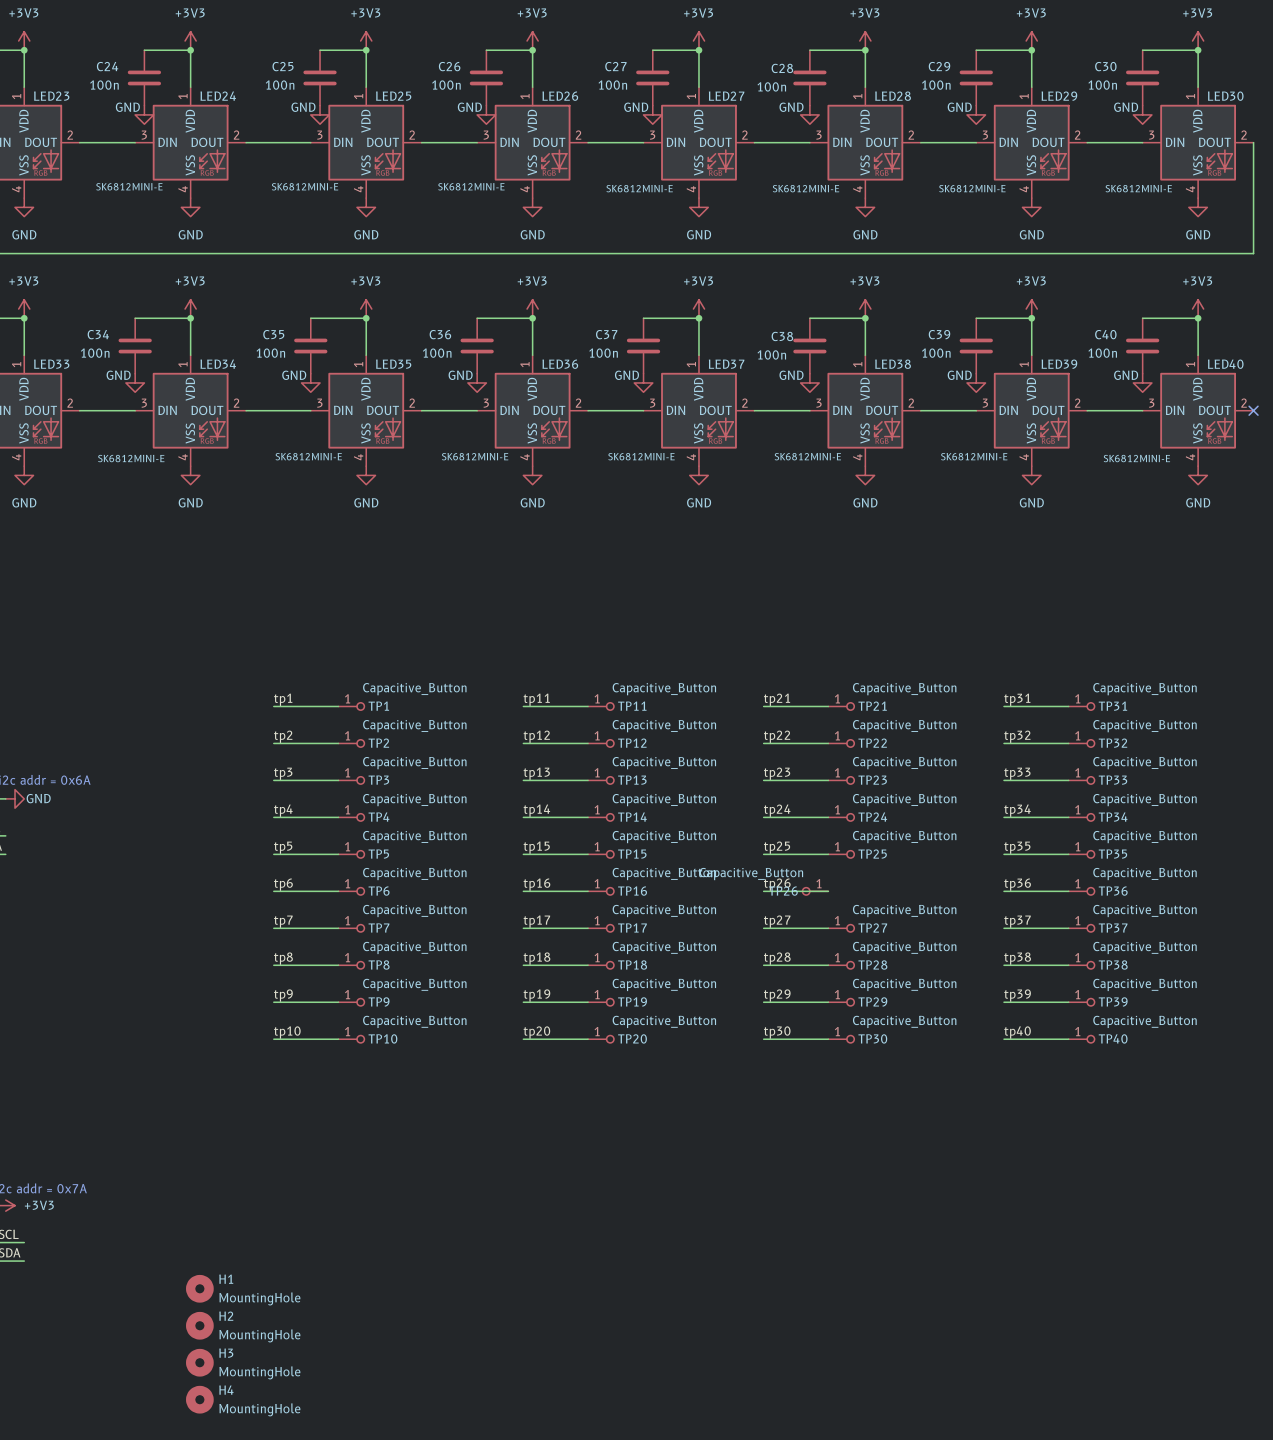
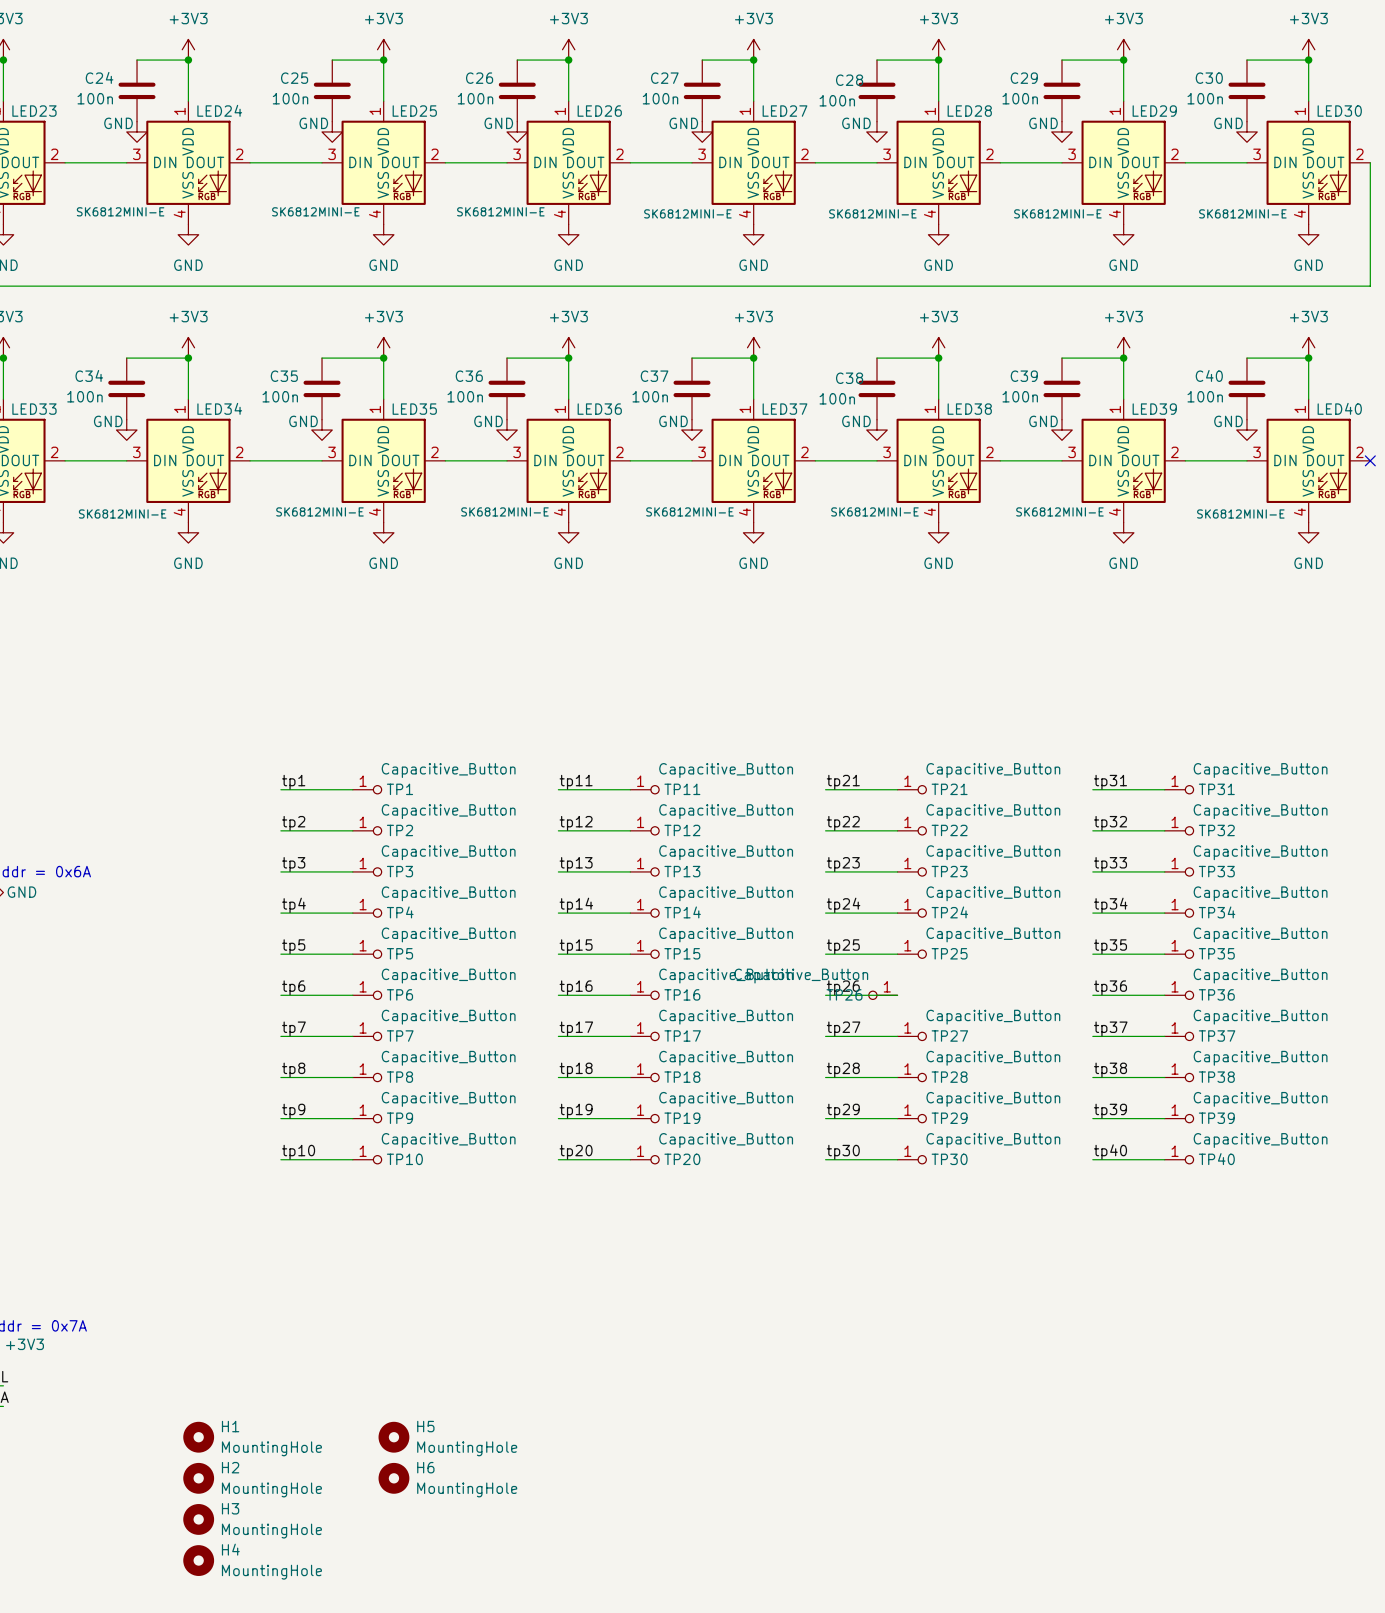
H5: none -> MountingHole (393, 1437)
H6: none -> MountingHole (393, 1478)

